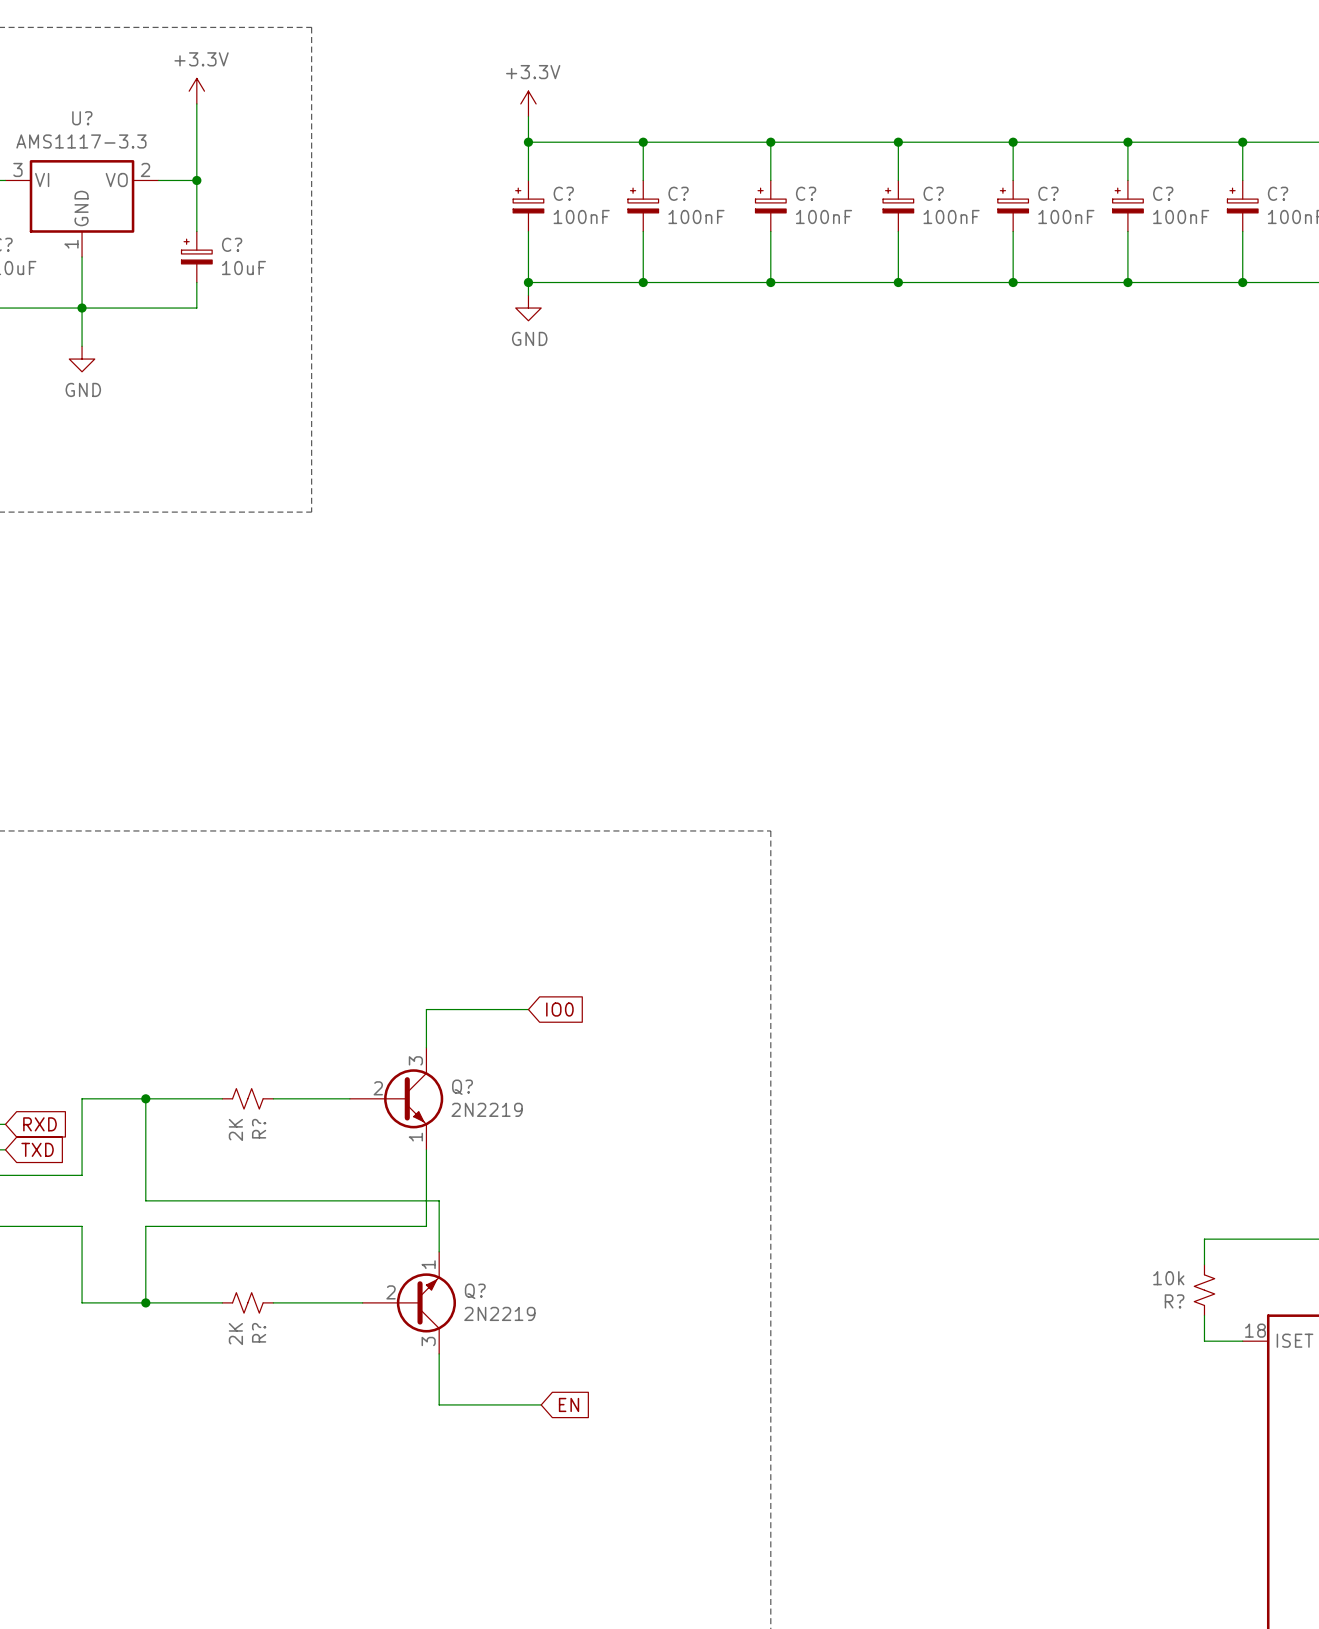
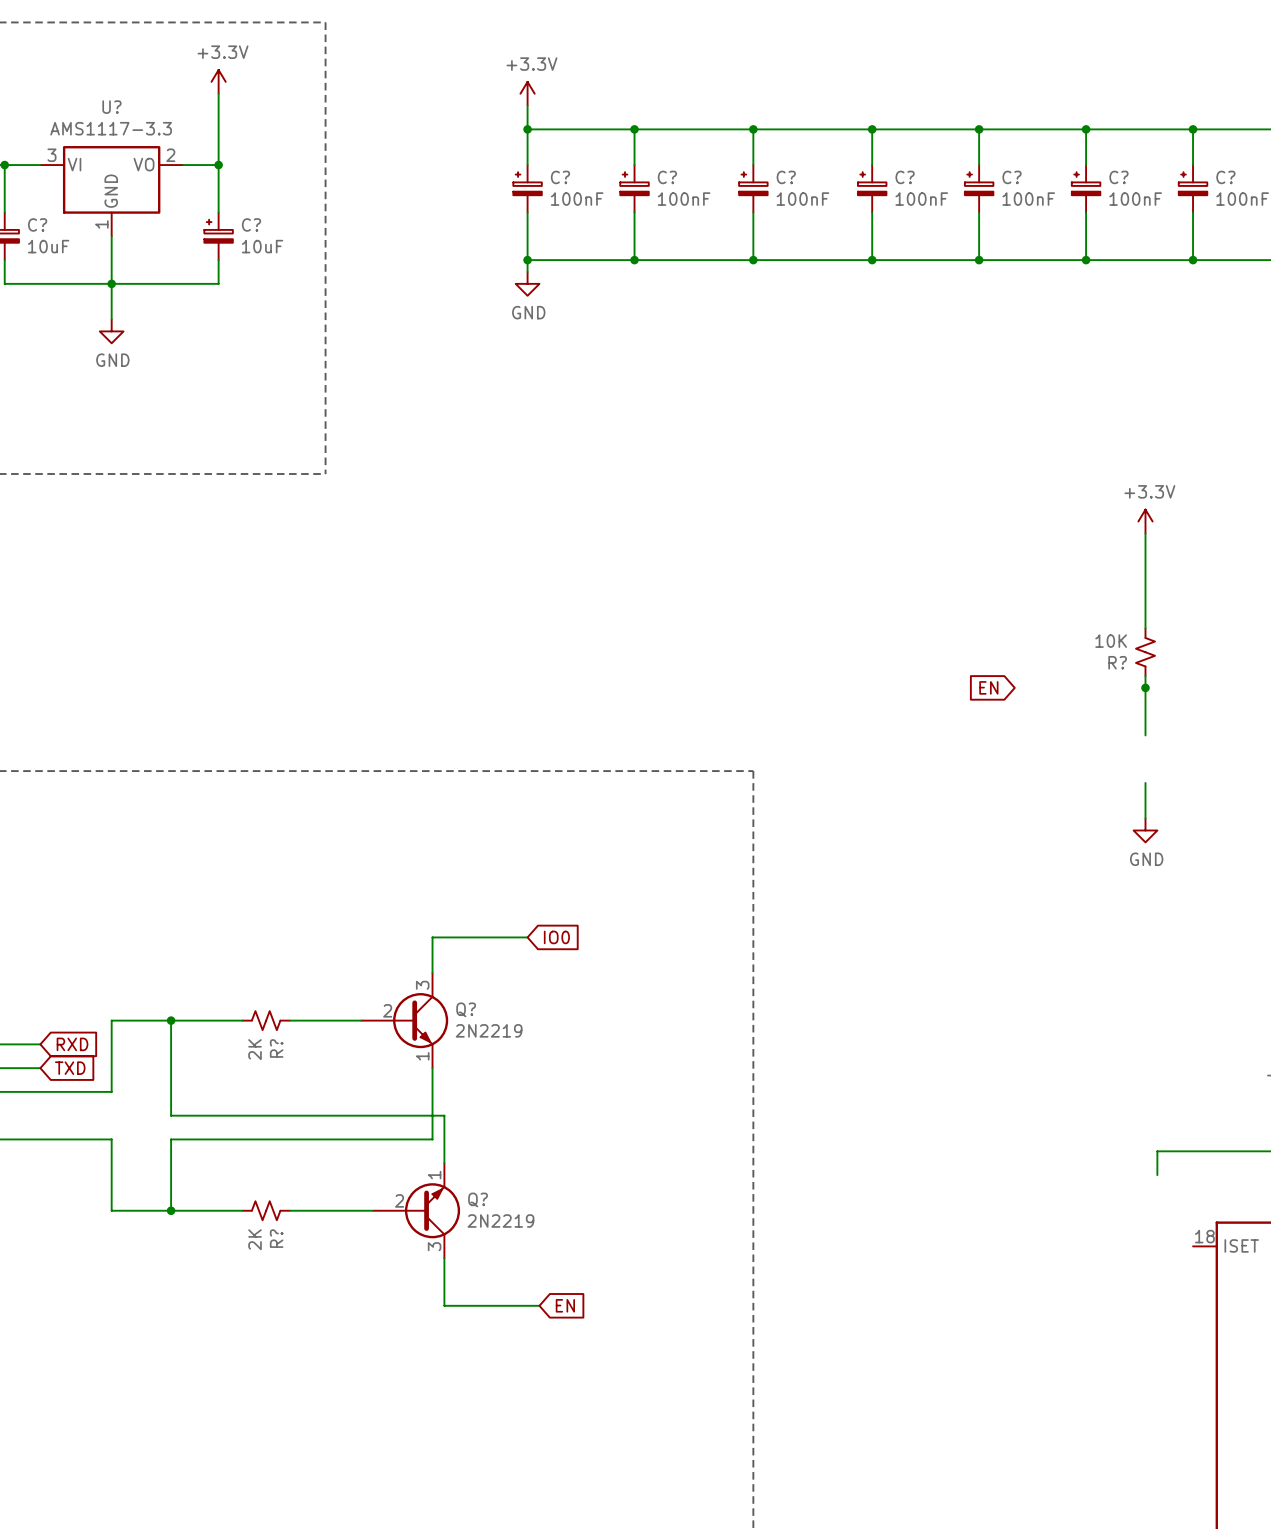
power symbol: none -> +3.3V (1145, 521)
wire: none -> (1145, 533) (1145, 628)
R?: none -> 10K (1145, 652)
wire: none -> (1145, 676) (1145, 735)
global label: none -> EN (988, 687)
junction: none -> (1145, 687)
wire: none -> (1145, 782) (1145, 818)
power symbol: none -> GND (1145, 830)
R?: 10k (1204, 1290) -> none
wire: (1204, 1315) (1204, 1341) (1242, 1341) -> none

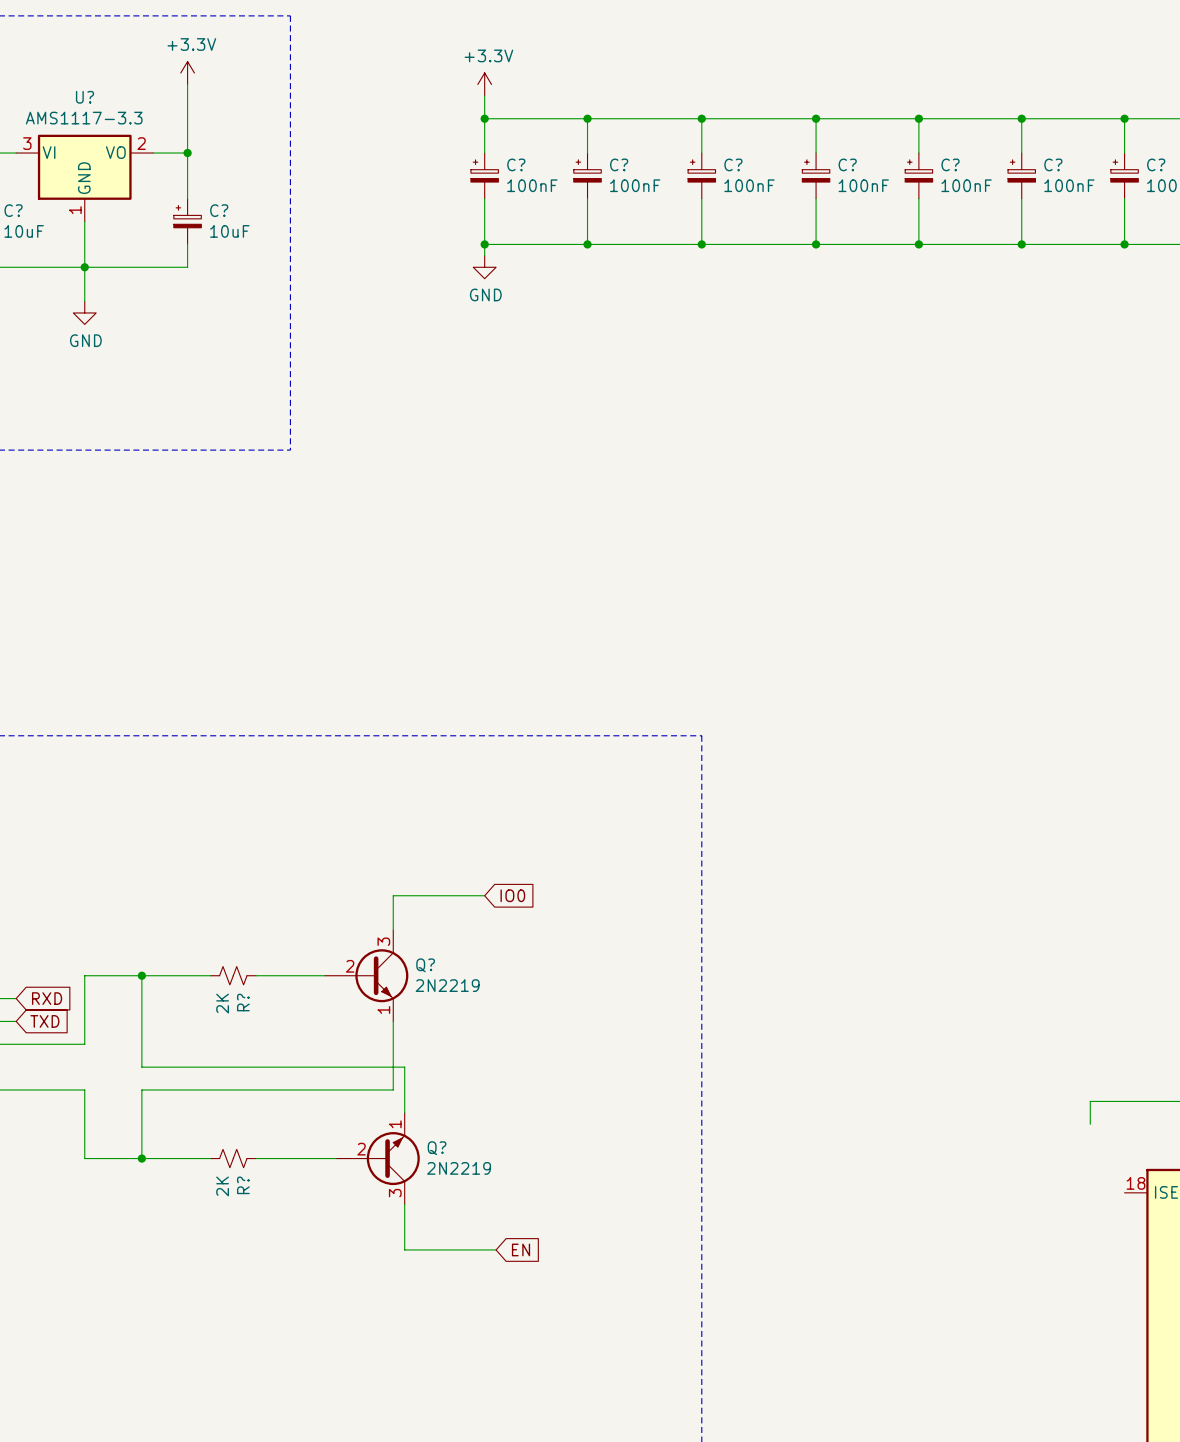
power symbol: +3.3V (1145, 521) -> none
wire: (1145, 533) (1145, 628) -> none
R?: 10K (1145, 652) -> none
wire: (1145, 676) (1145, 735) -> none
global label: EN (988, 687) -> none
junction: (1145, 687) -> none
wire: (1145, 782) (1145, 818) -> none
power symbol: GND (1145, 830) -> none

